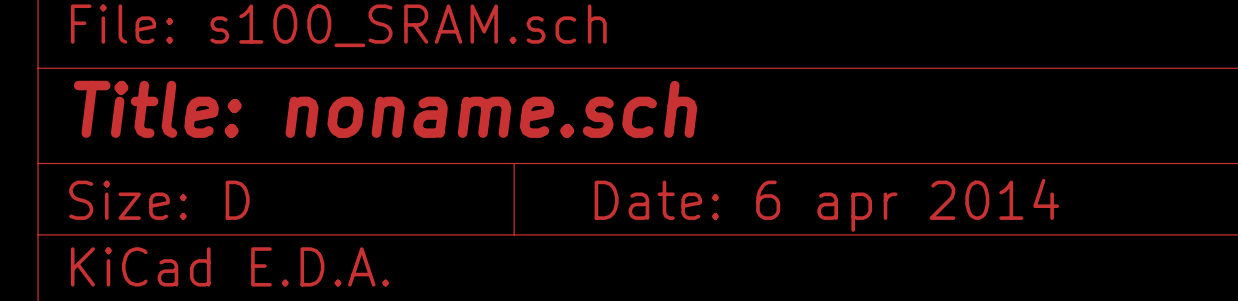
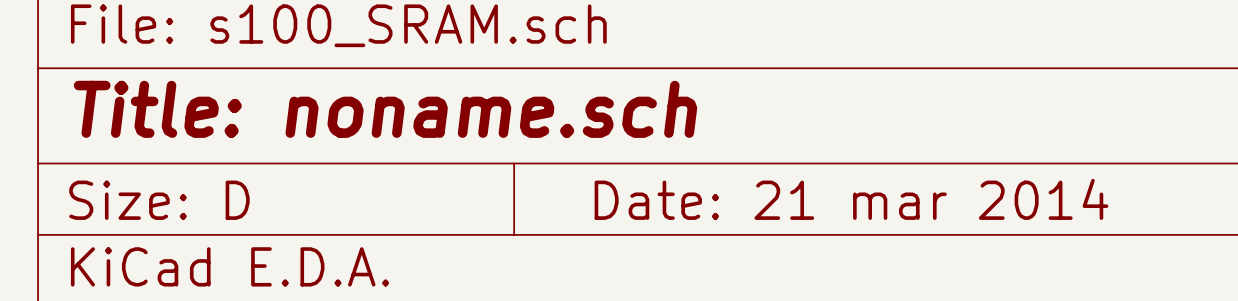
title block: Date: 6 apr 2014 (826, 205) -> Date: 21 mar 2014 (851, 199)

